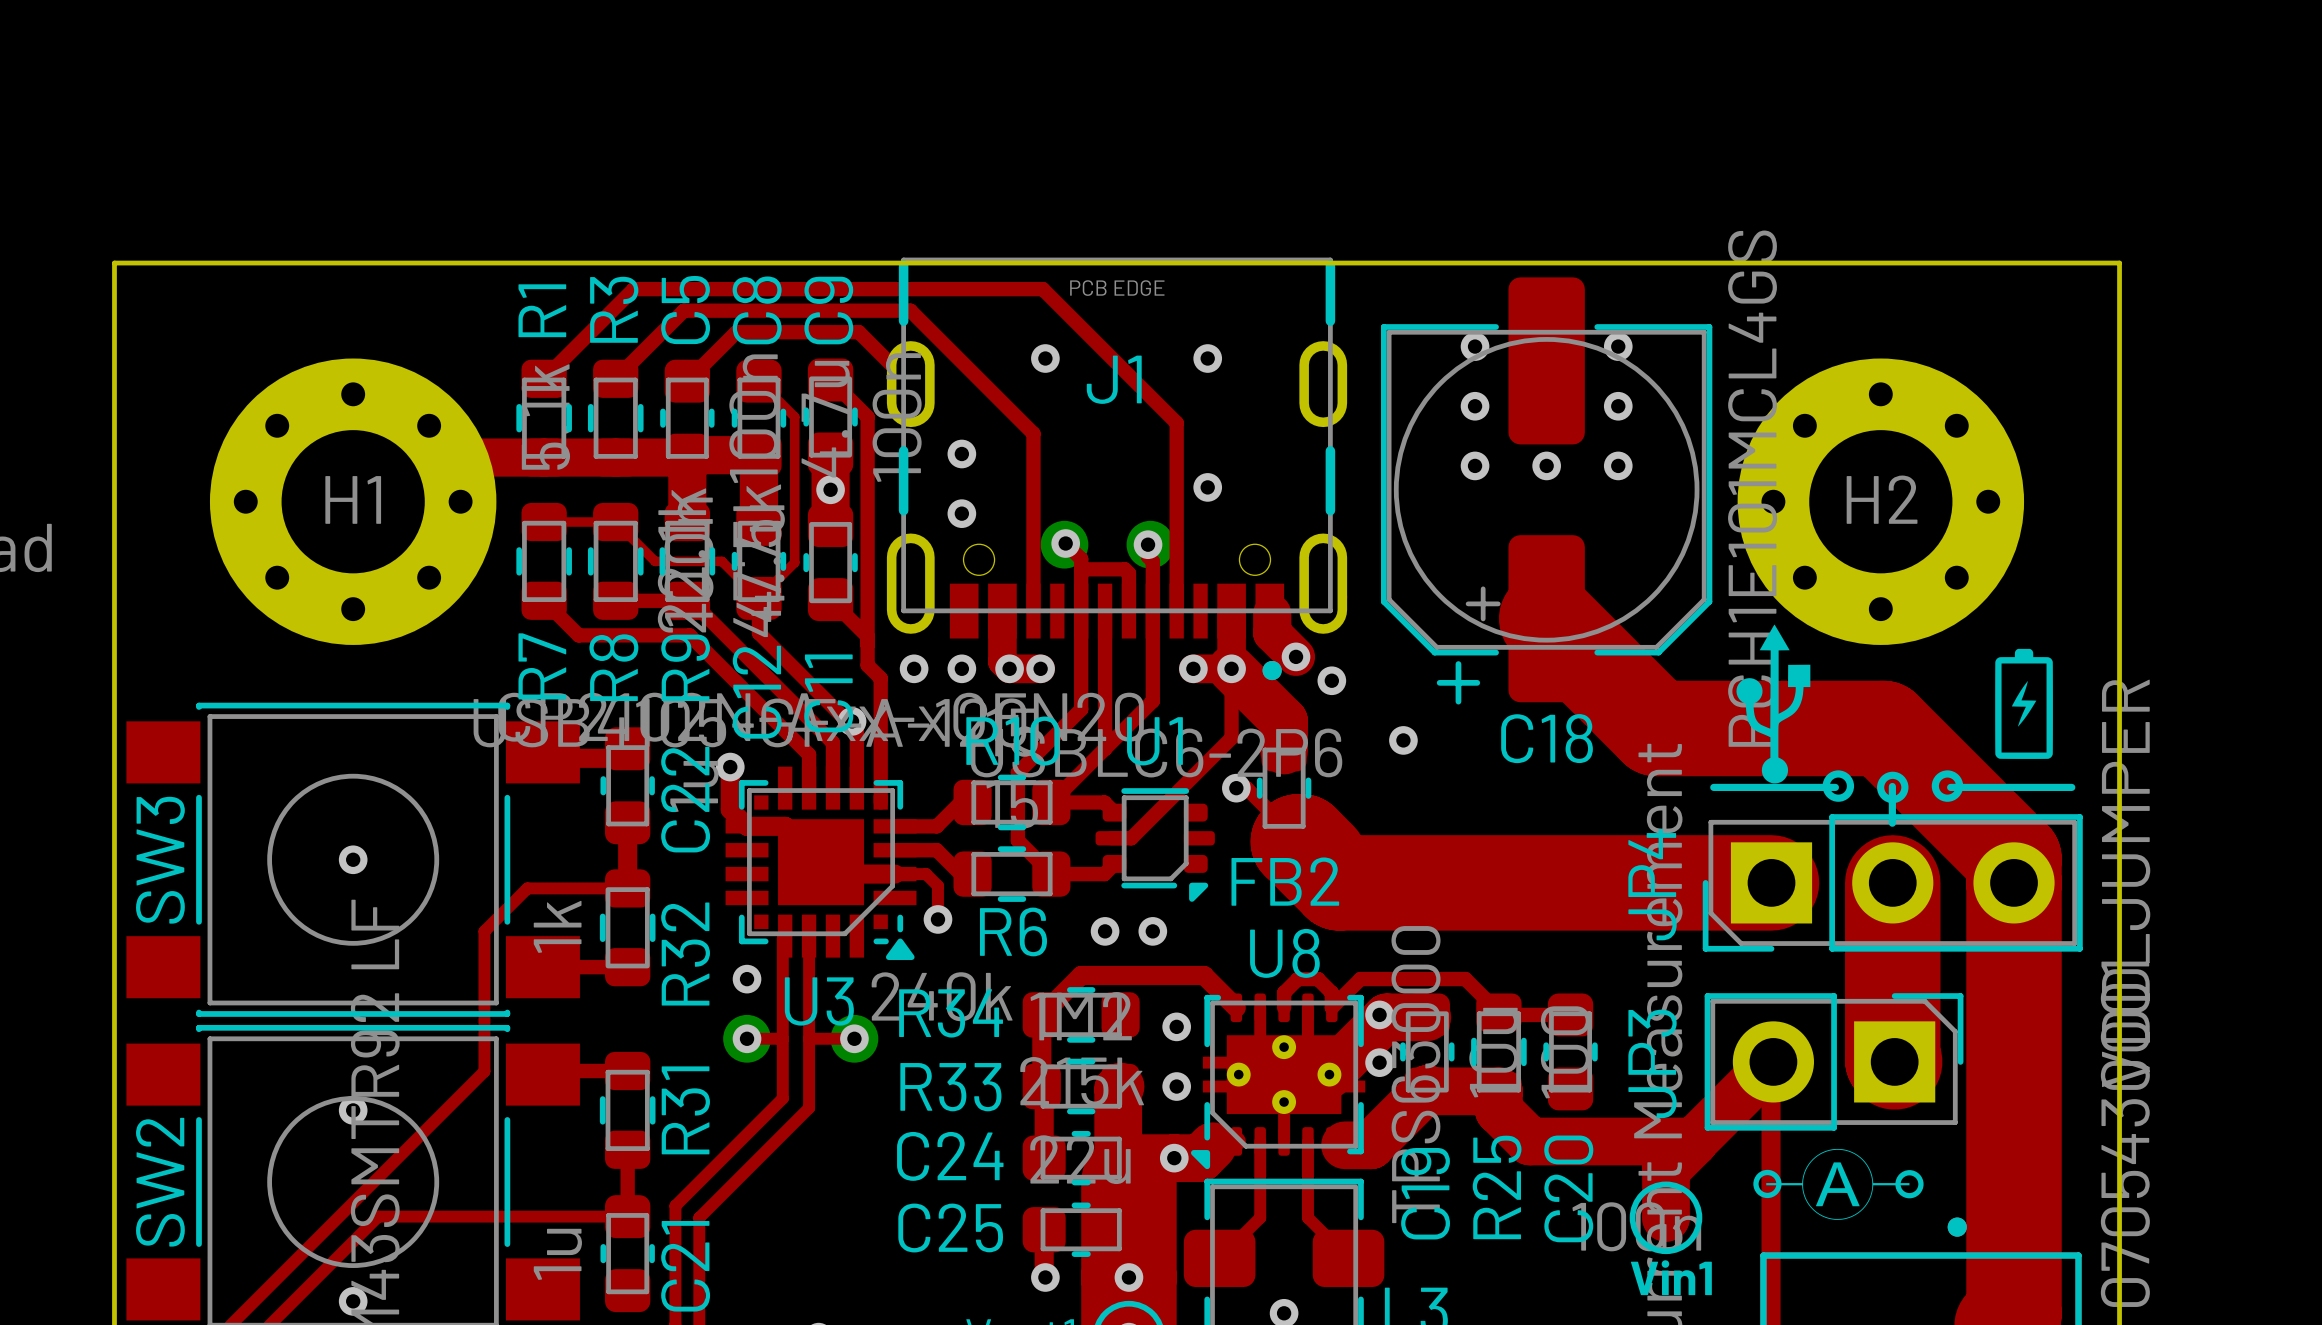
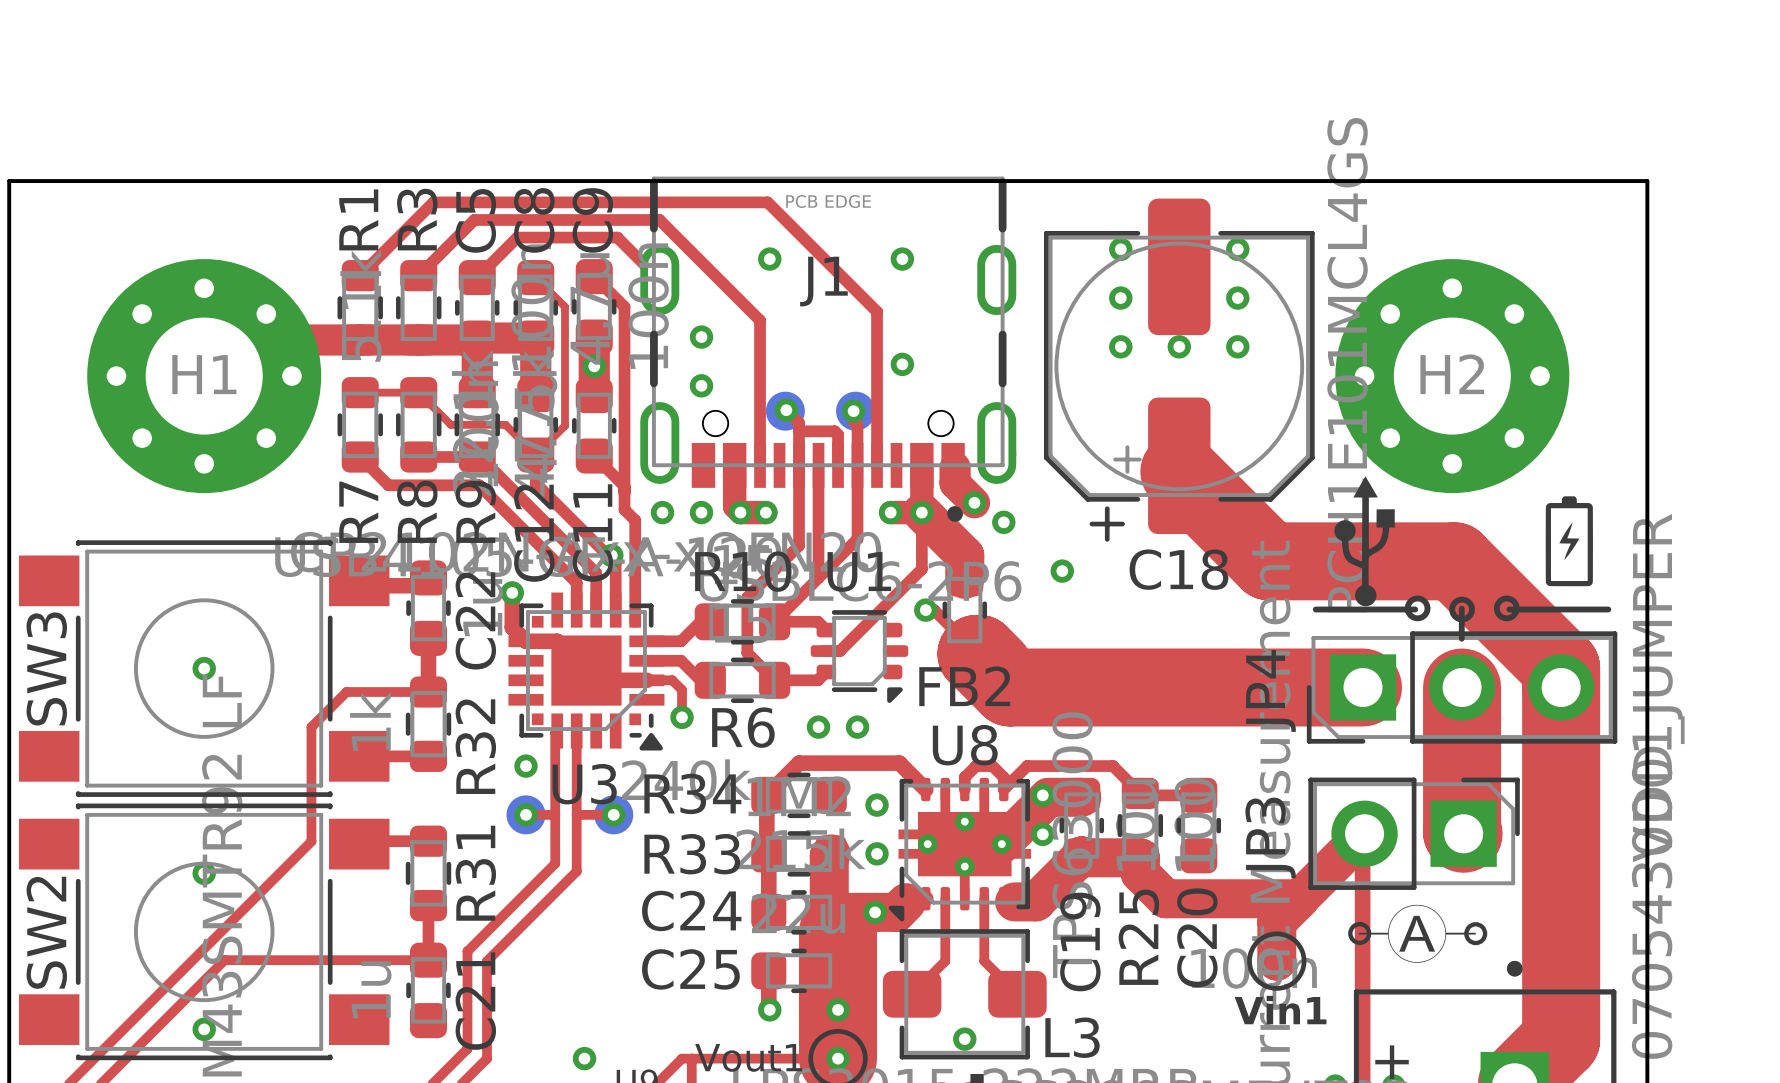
C18 footprint: [1381, 277, 1713, 705] -> [1043, 198, 1315, 542]

